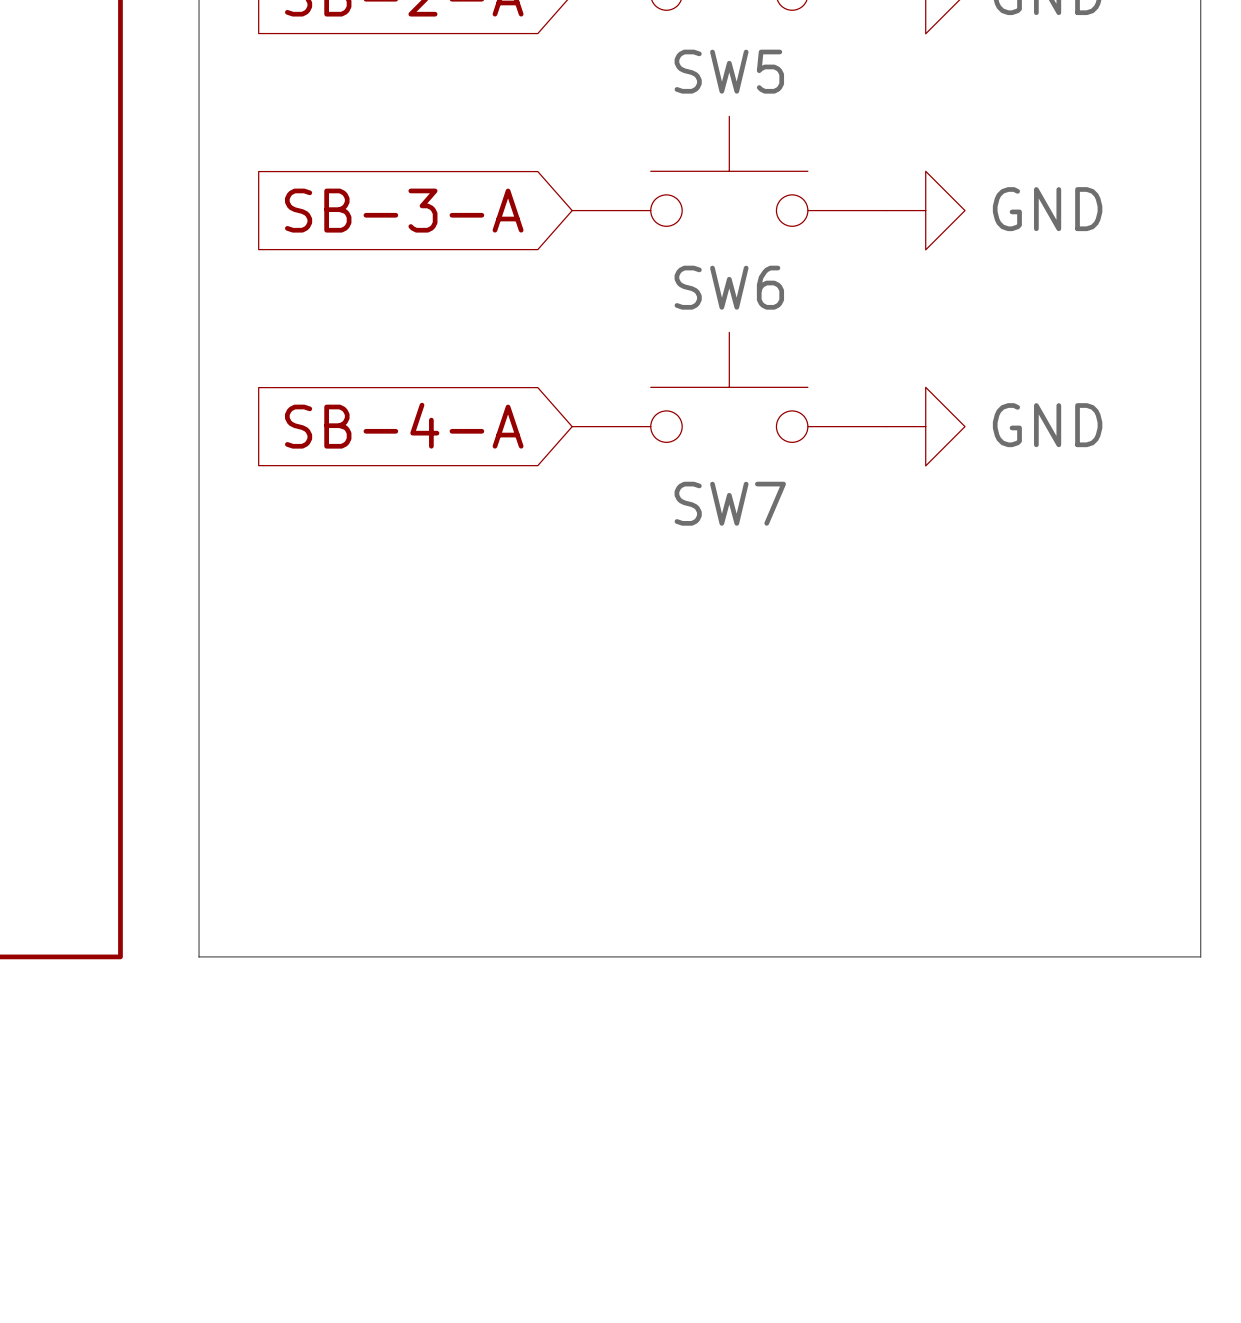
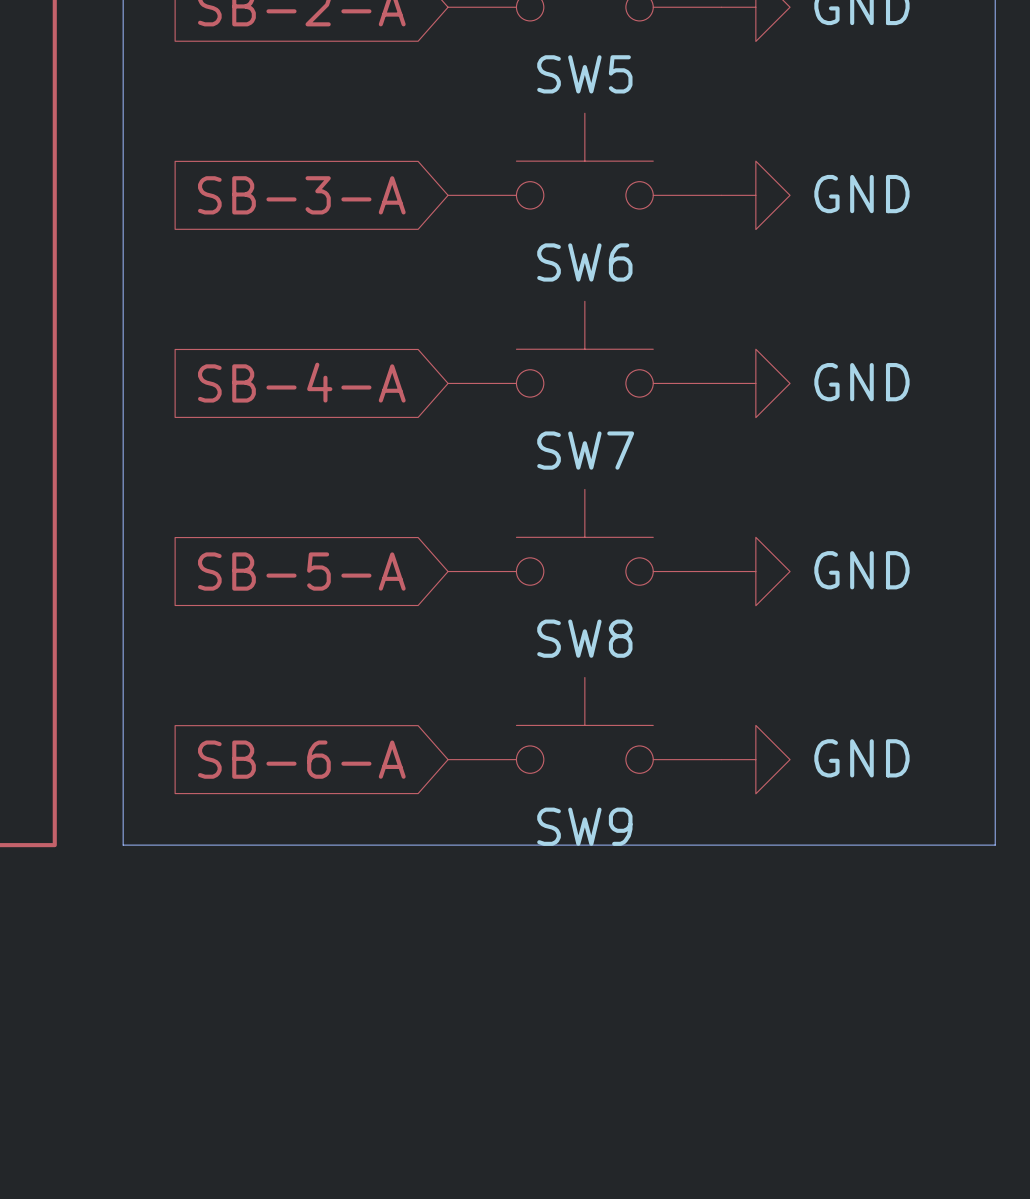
SW8: none -> (584, 537)
global label: none -> SB-5-A (301, 571)
power symbol: none -> GND (755, 571)
SW9: none -> (584, 725)
global label: none -> SB-6-A (301, 759)
power symbol: none -> GND (755, 759)

